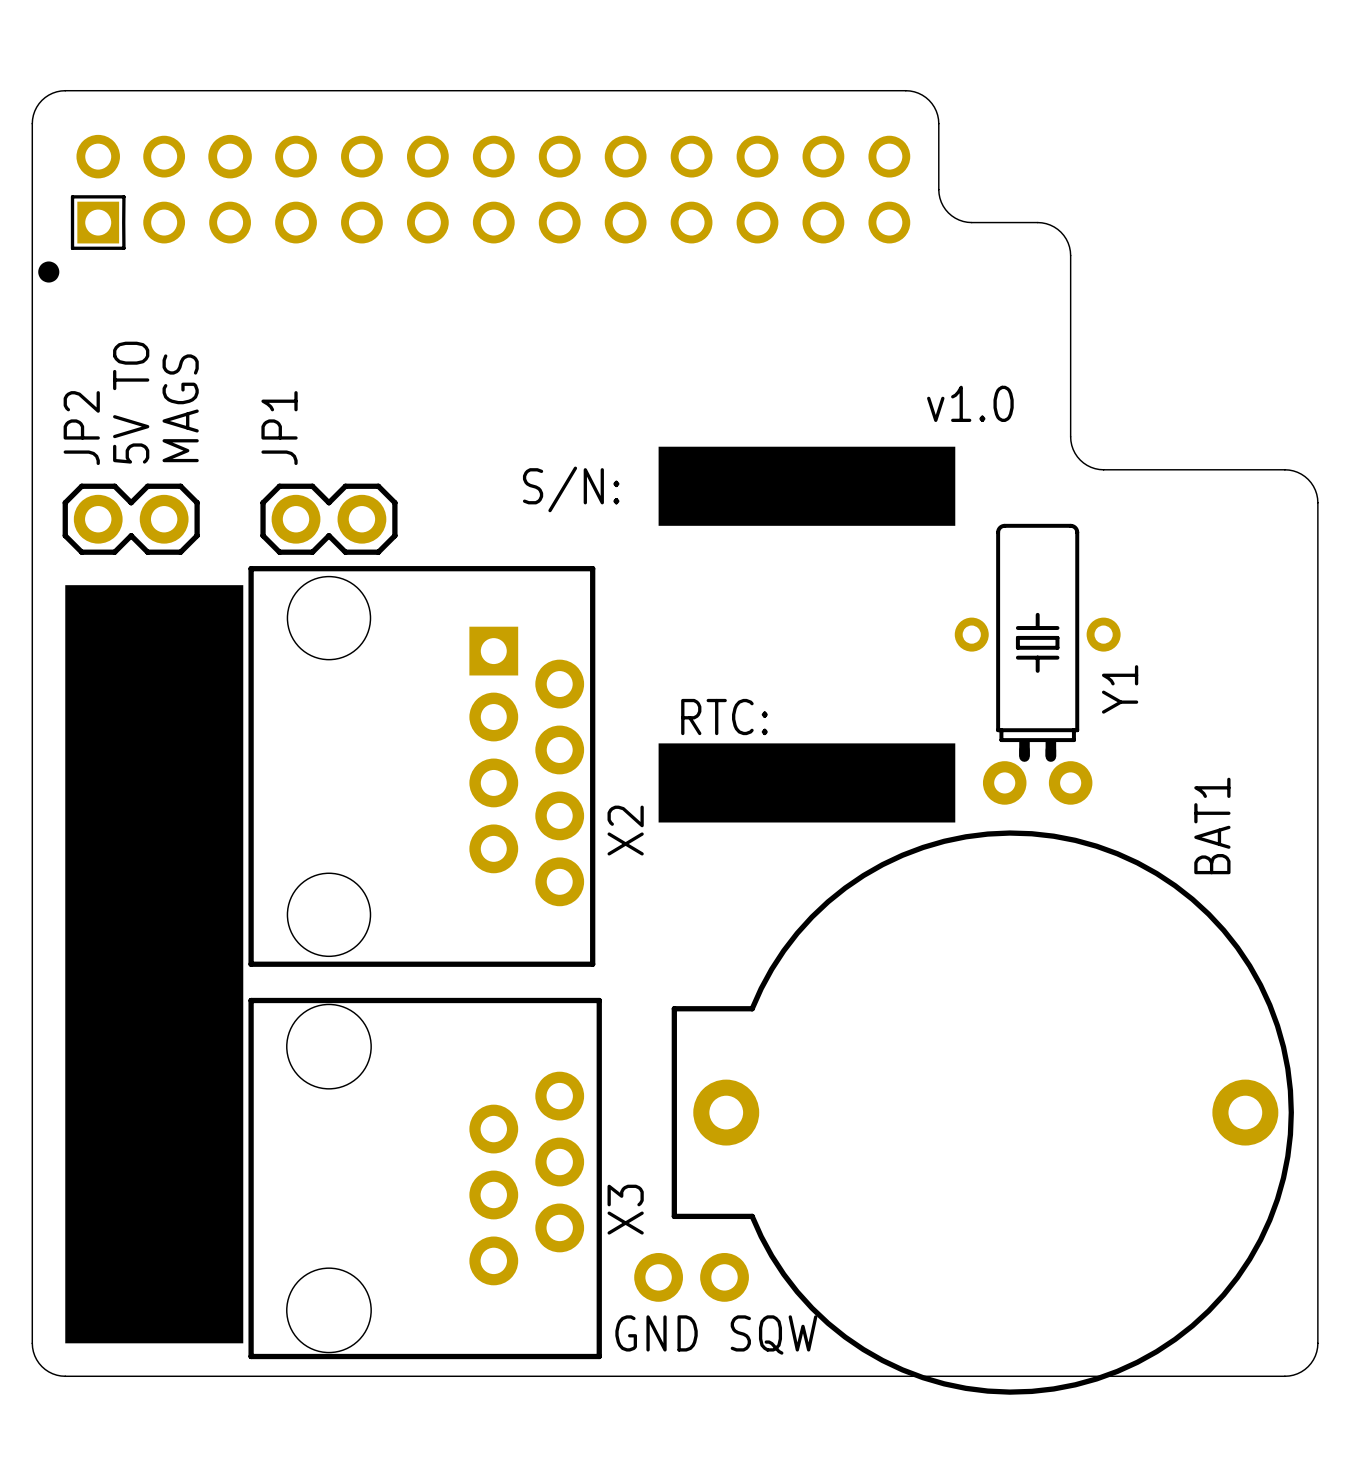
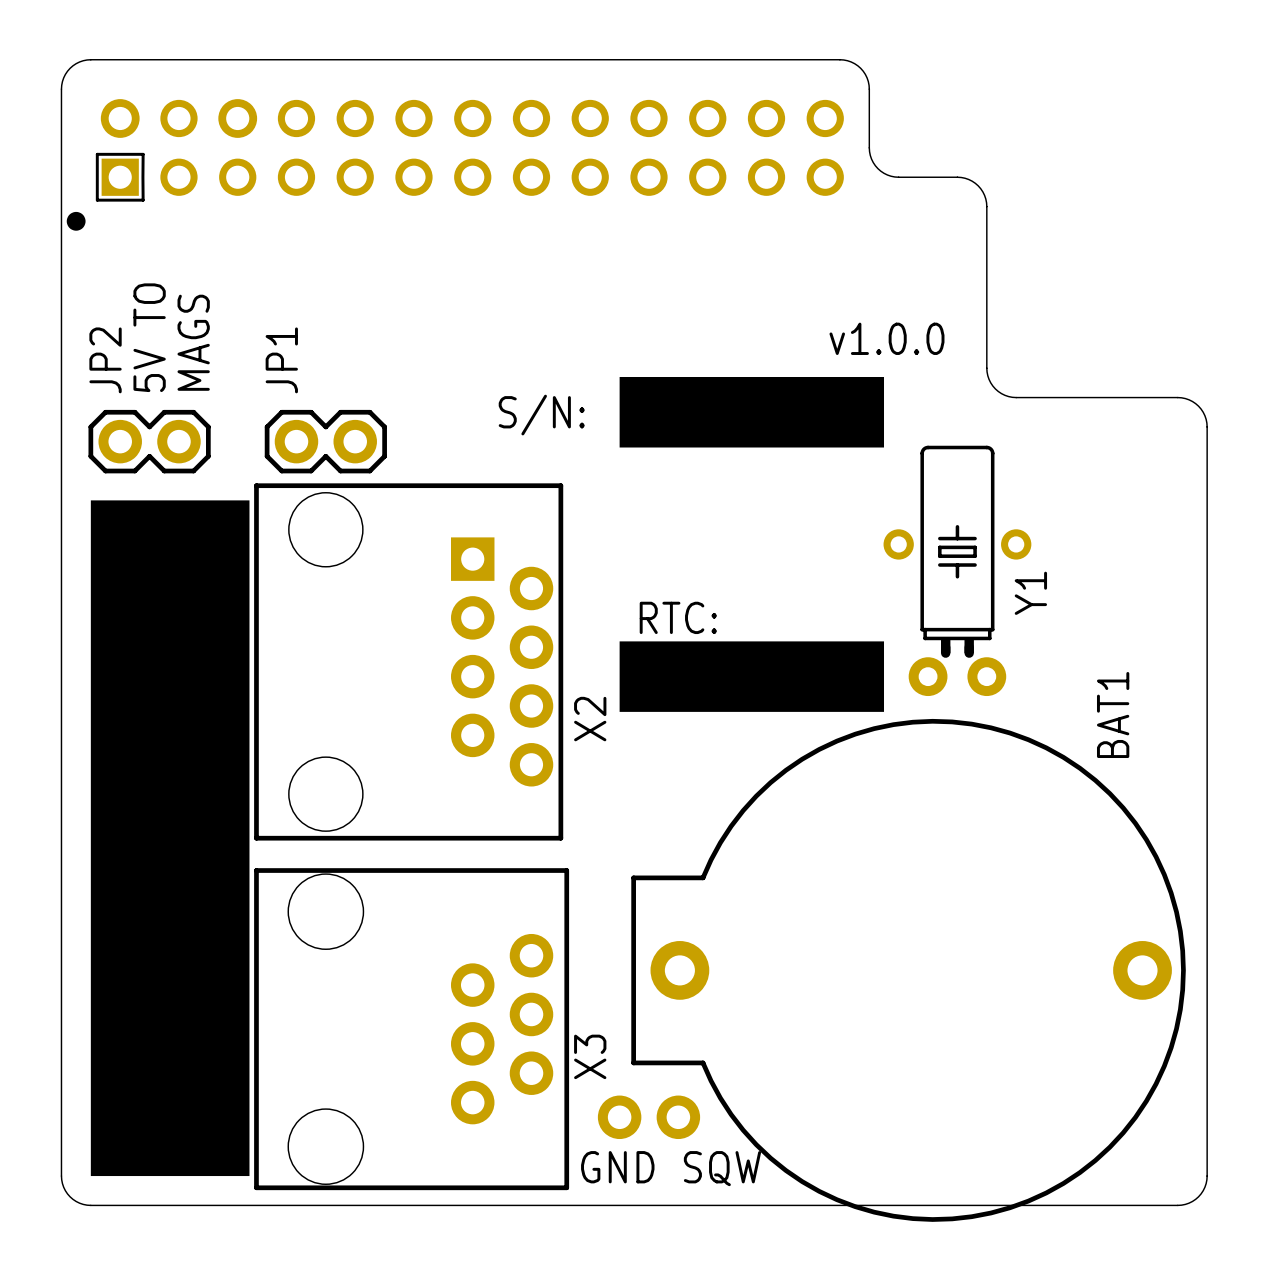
text: v1.0 (970, 403) -> v1.0.0 (886, 338)

